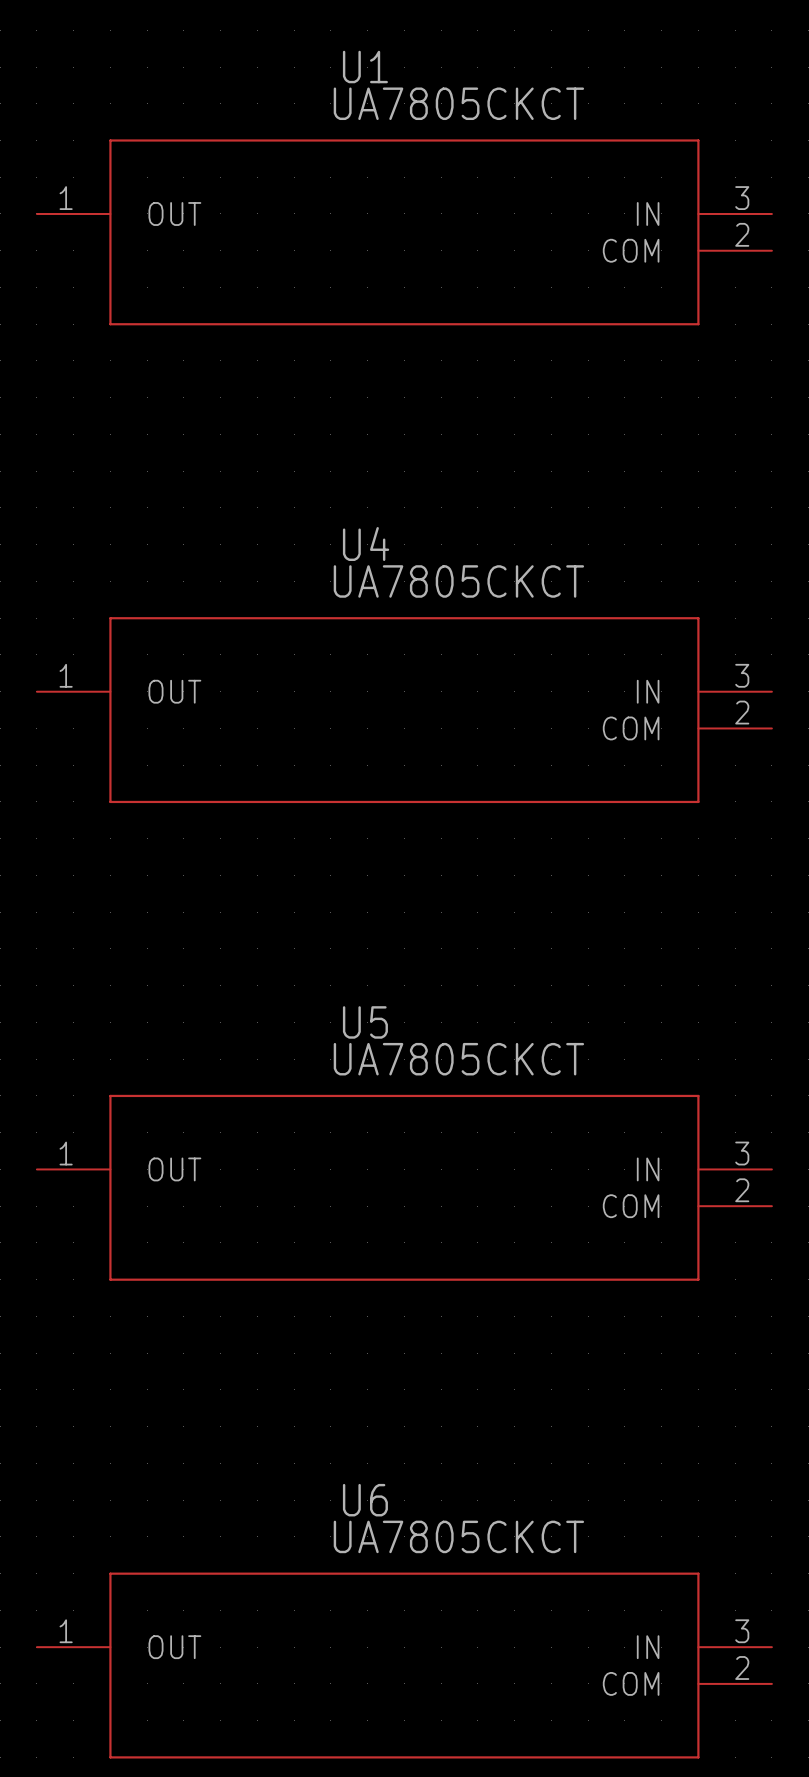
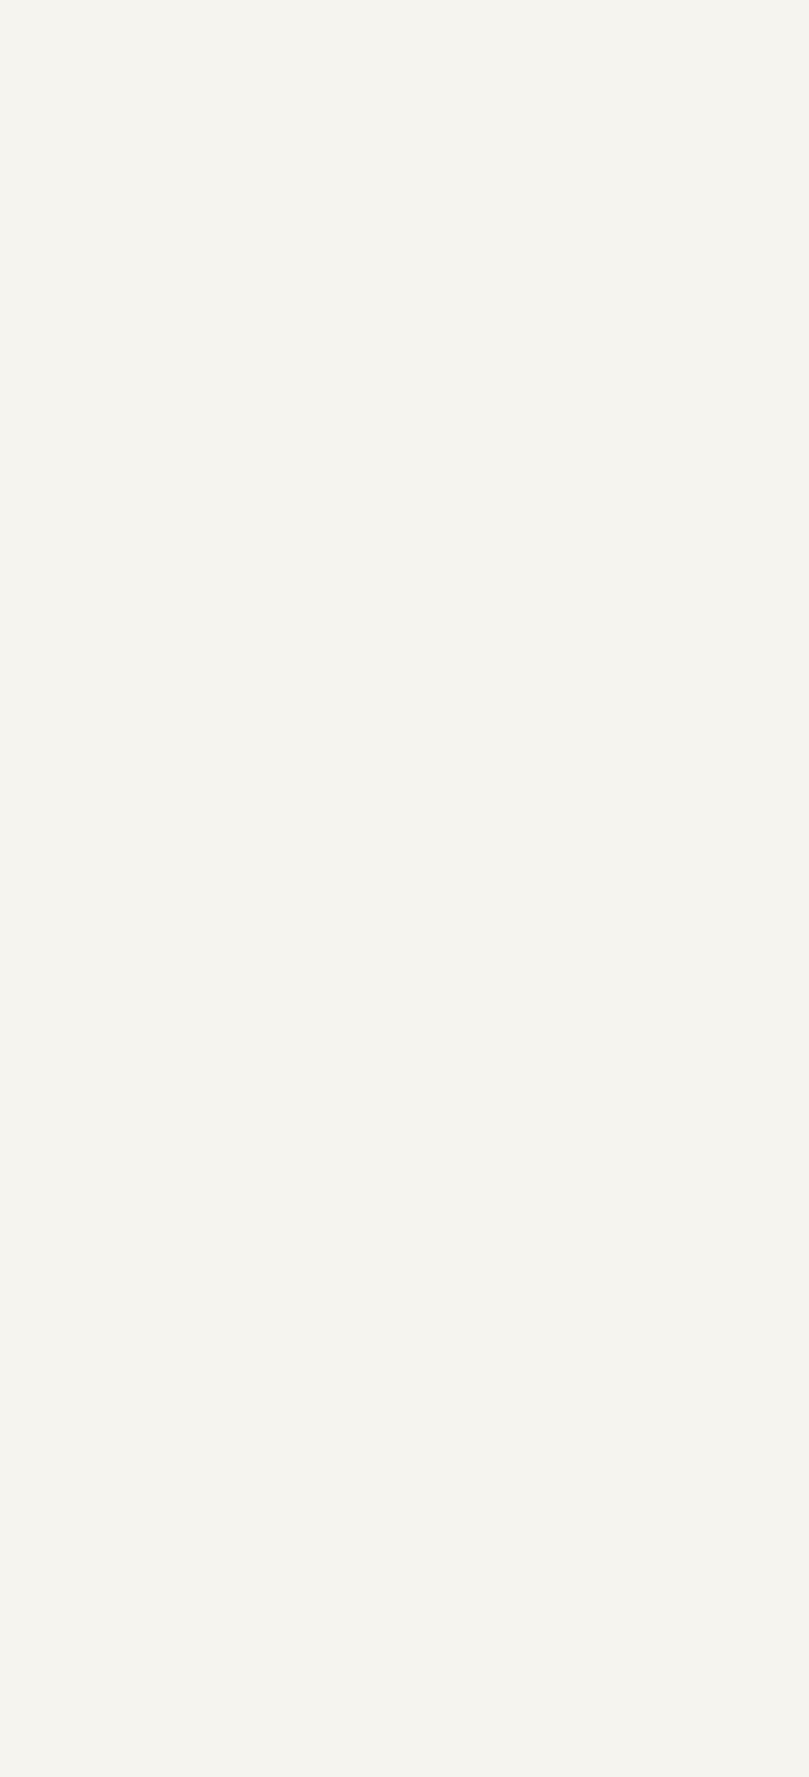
U1: UA7805CKCT (404, 232) -> none
U4: UA7805CKCT (404, 710) -> none
U5: UA7805CKCT (404, 1187) -> none
U6: UA7805CKCT (404, 1665) -> none

